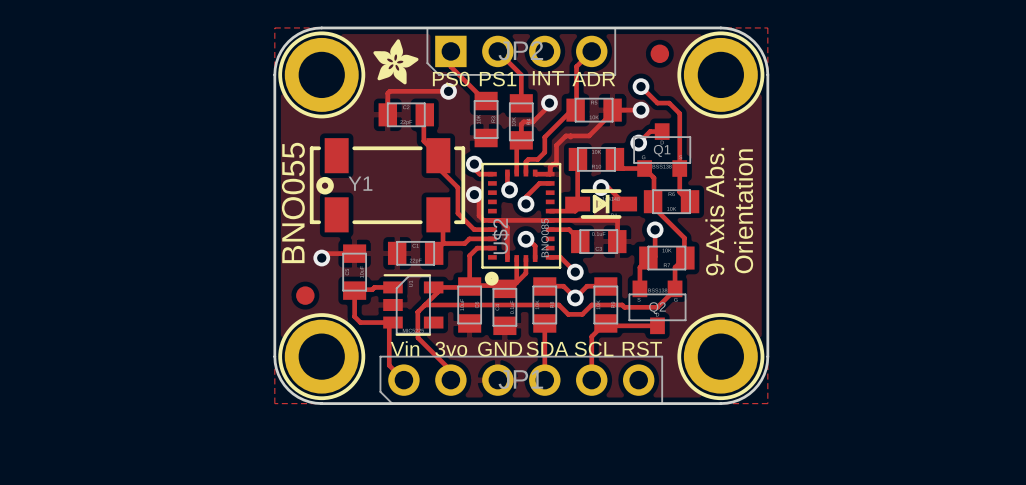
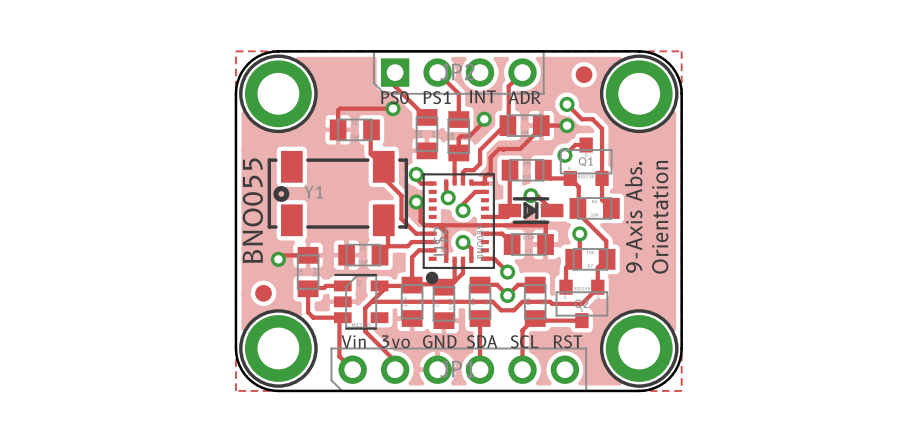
drawing: [373, 39, 419, 85] -> none

